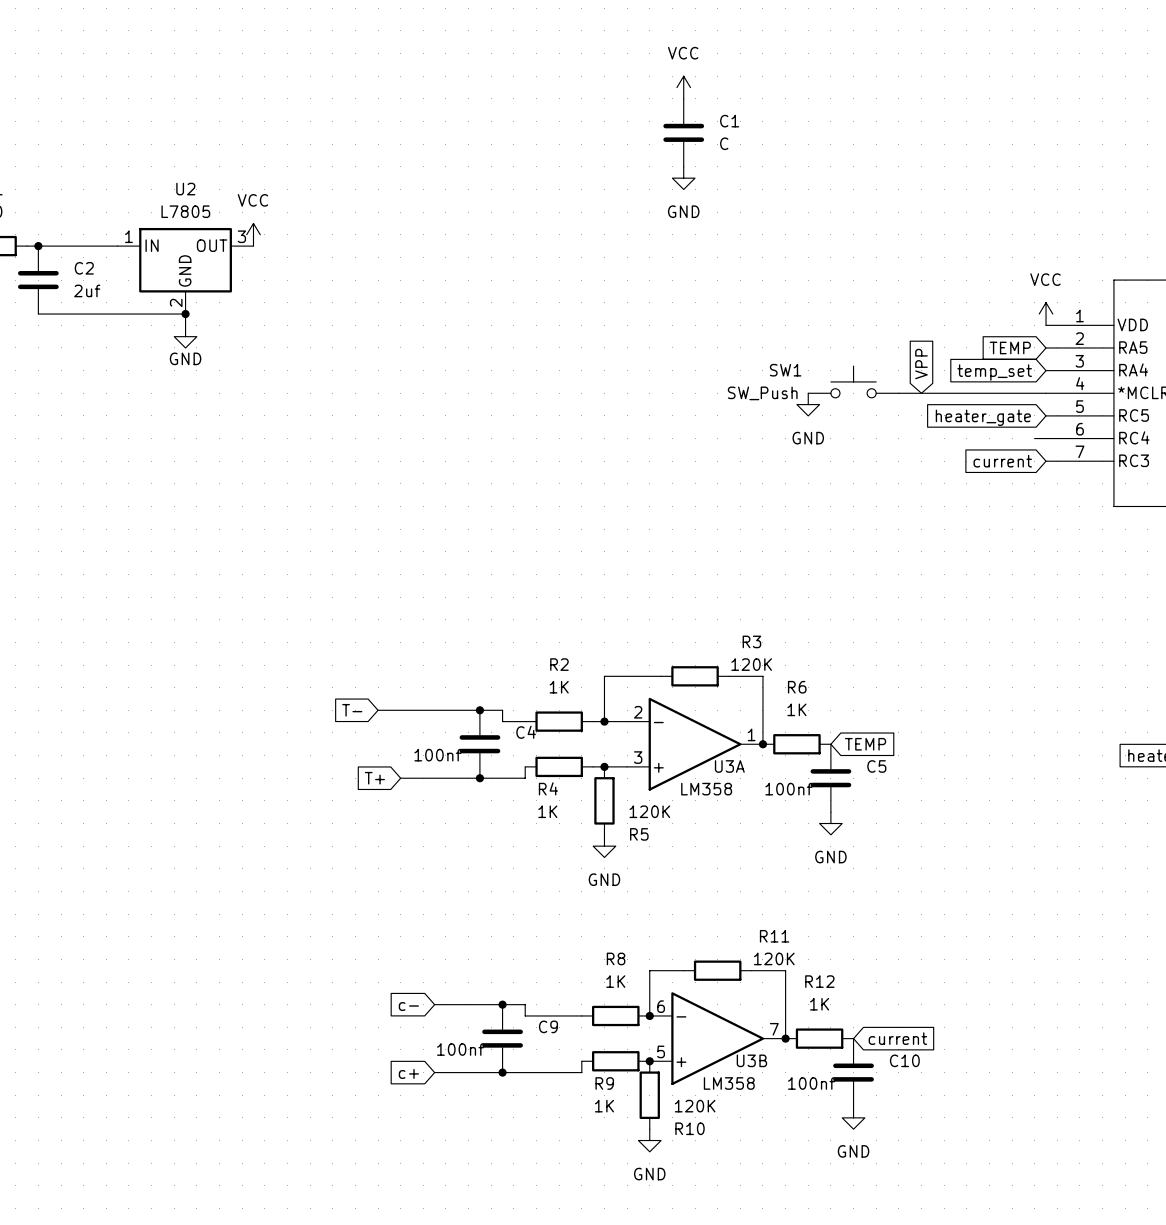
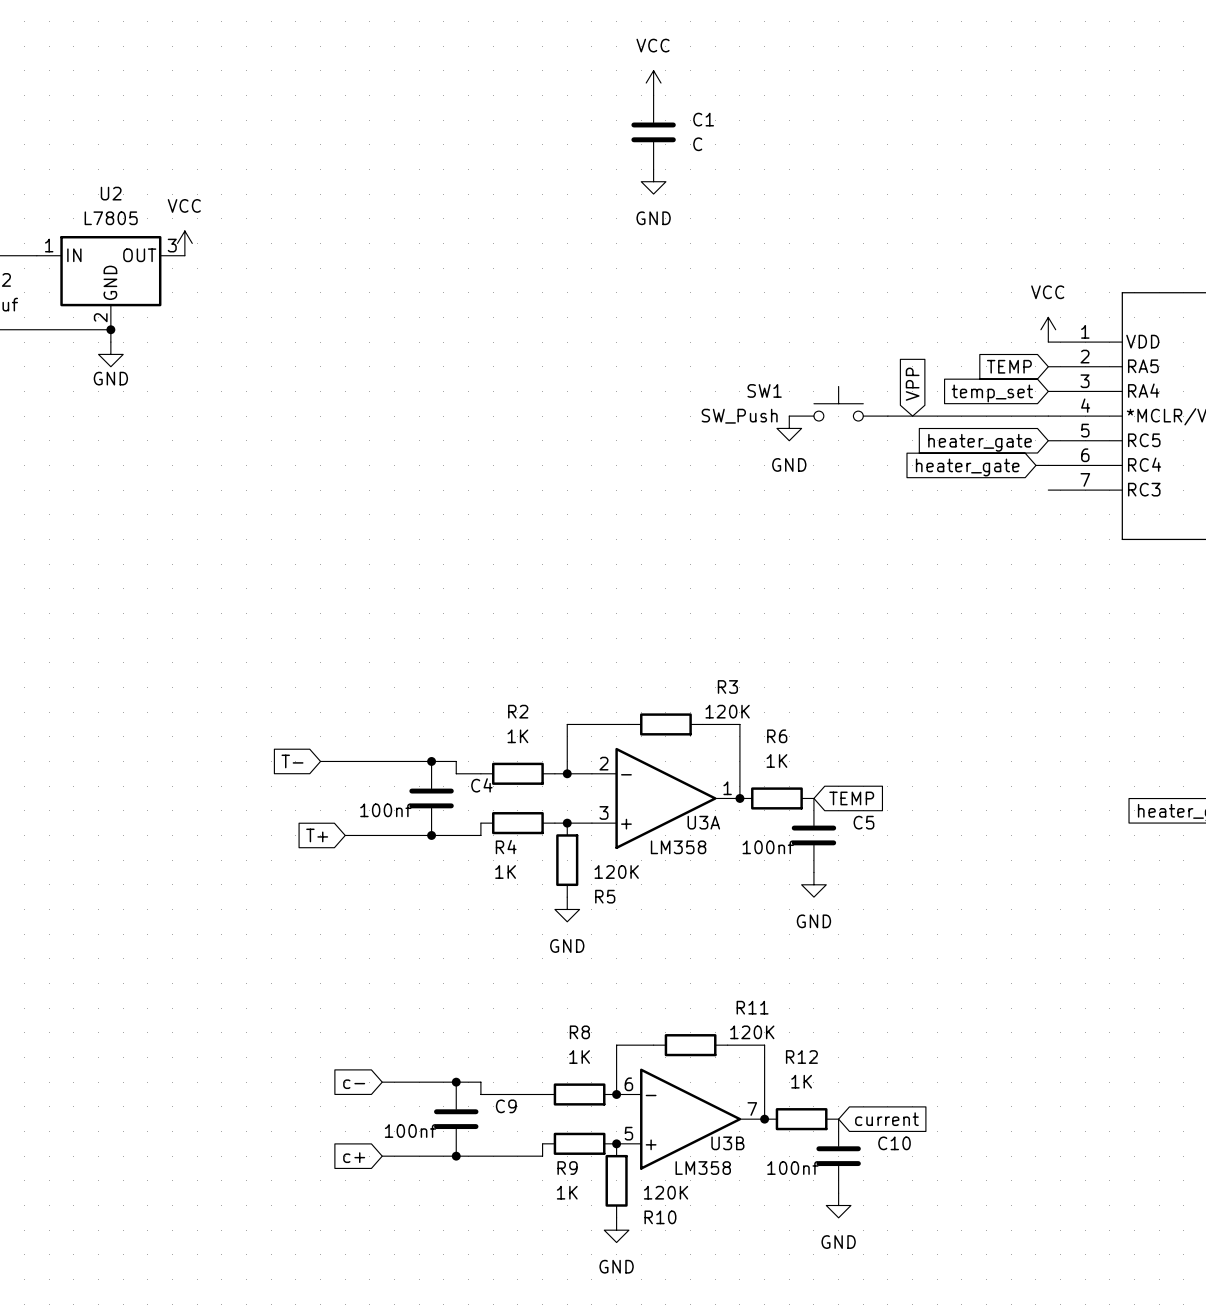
global label: none -> heater_gate (967, 467)
global label: current (1002, 461) -> none

